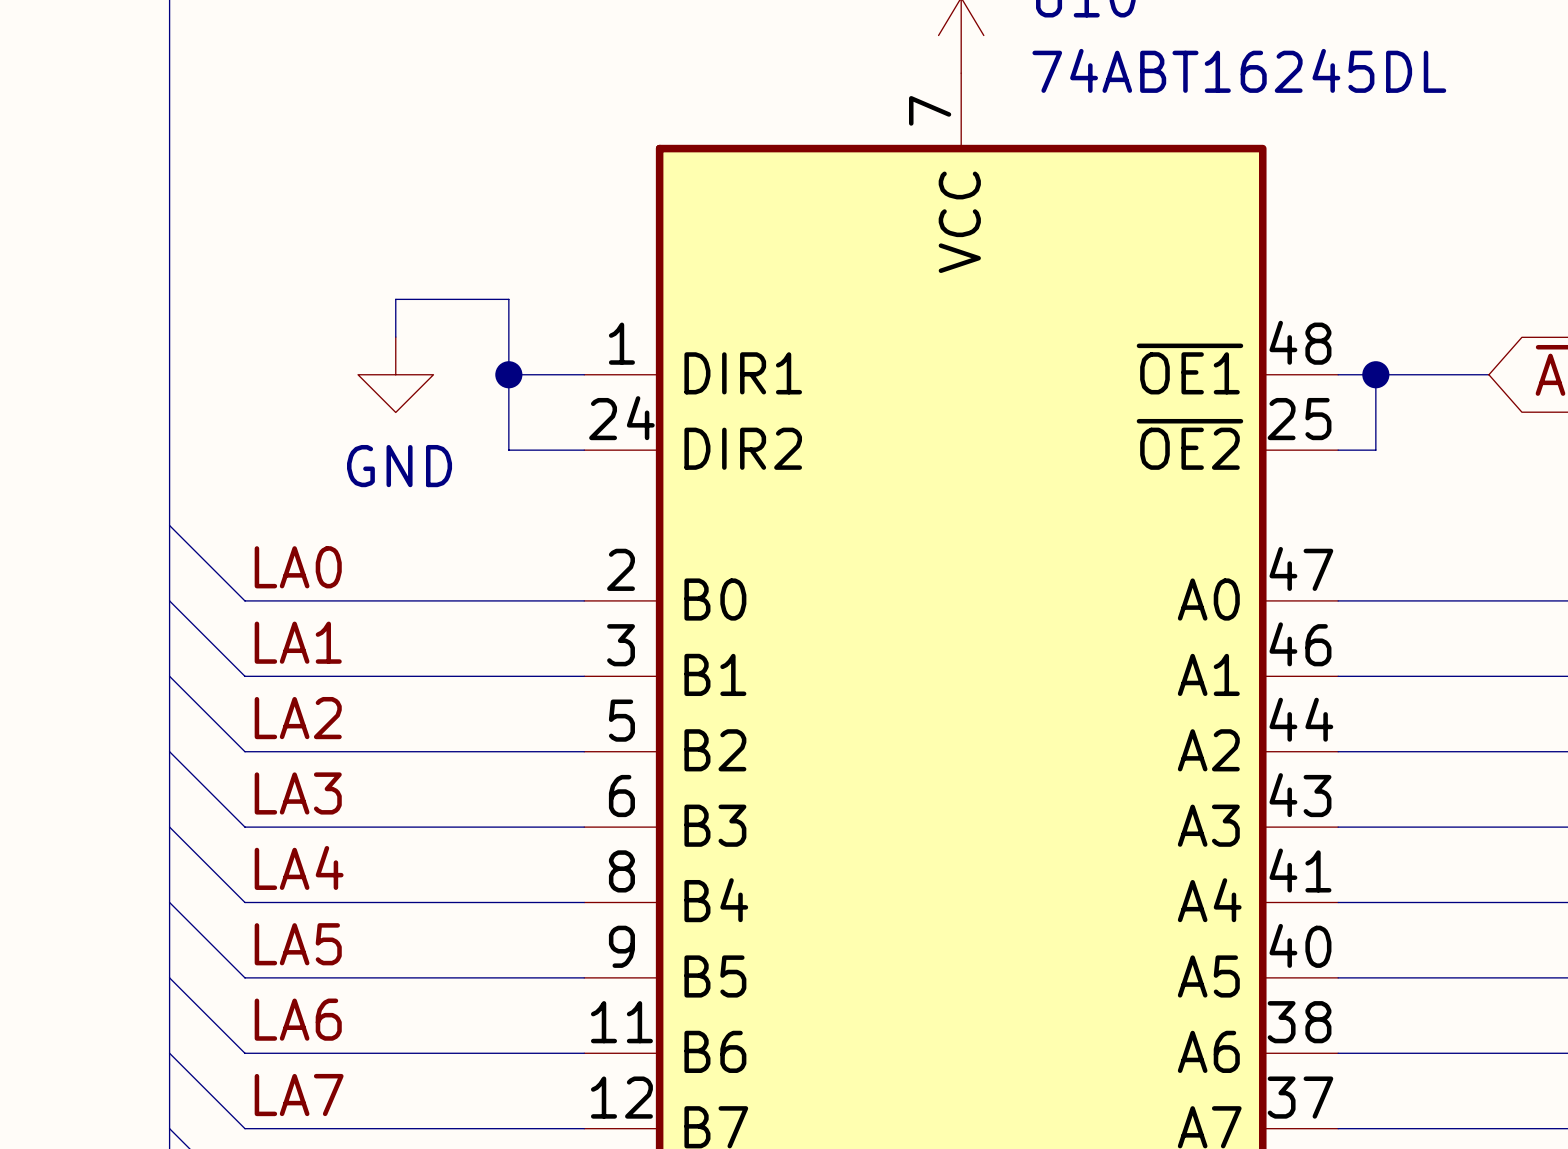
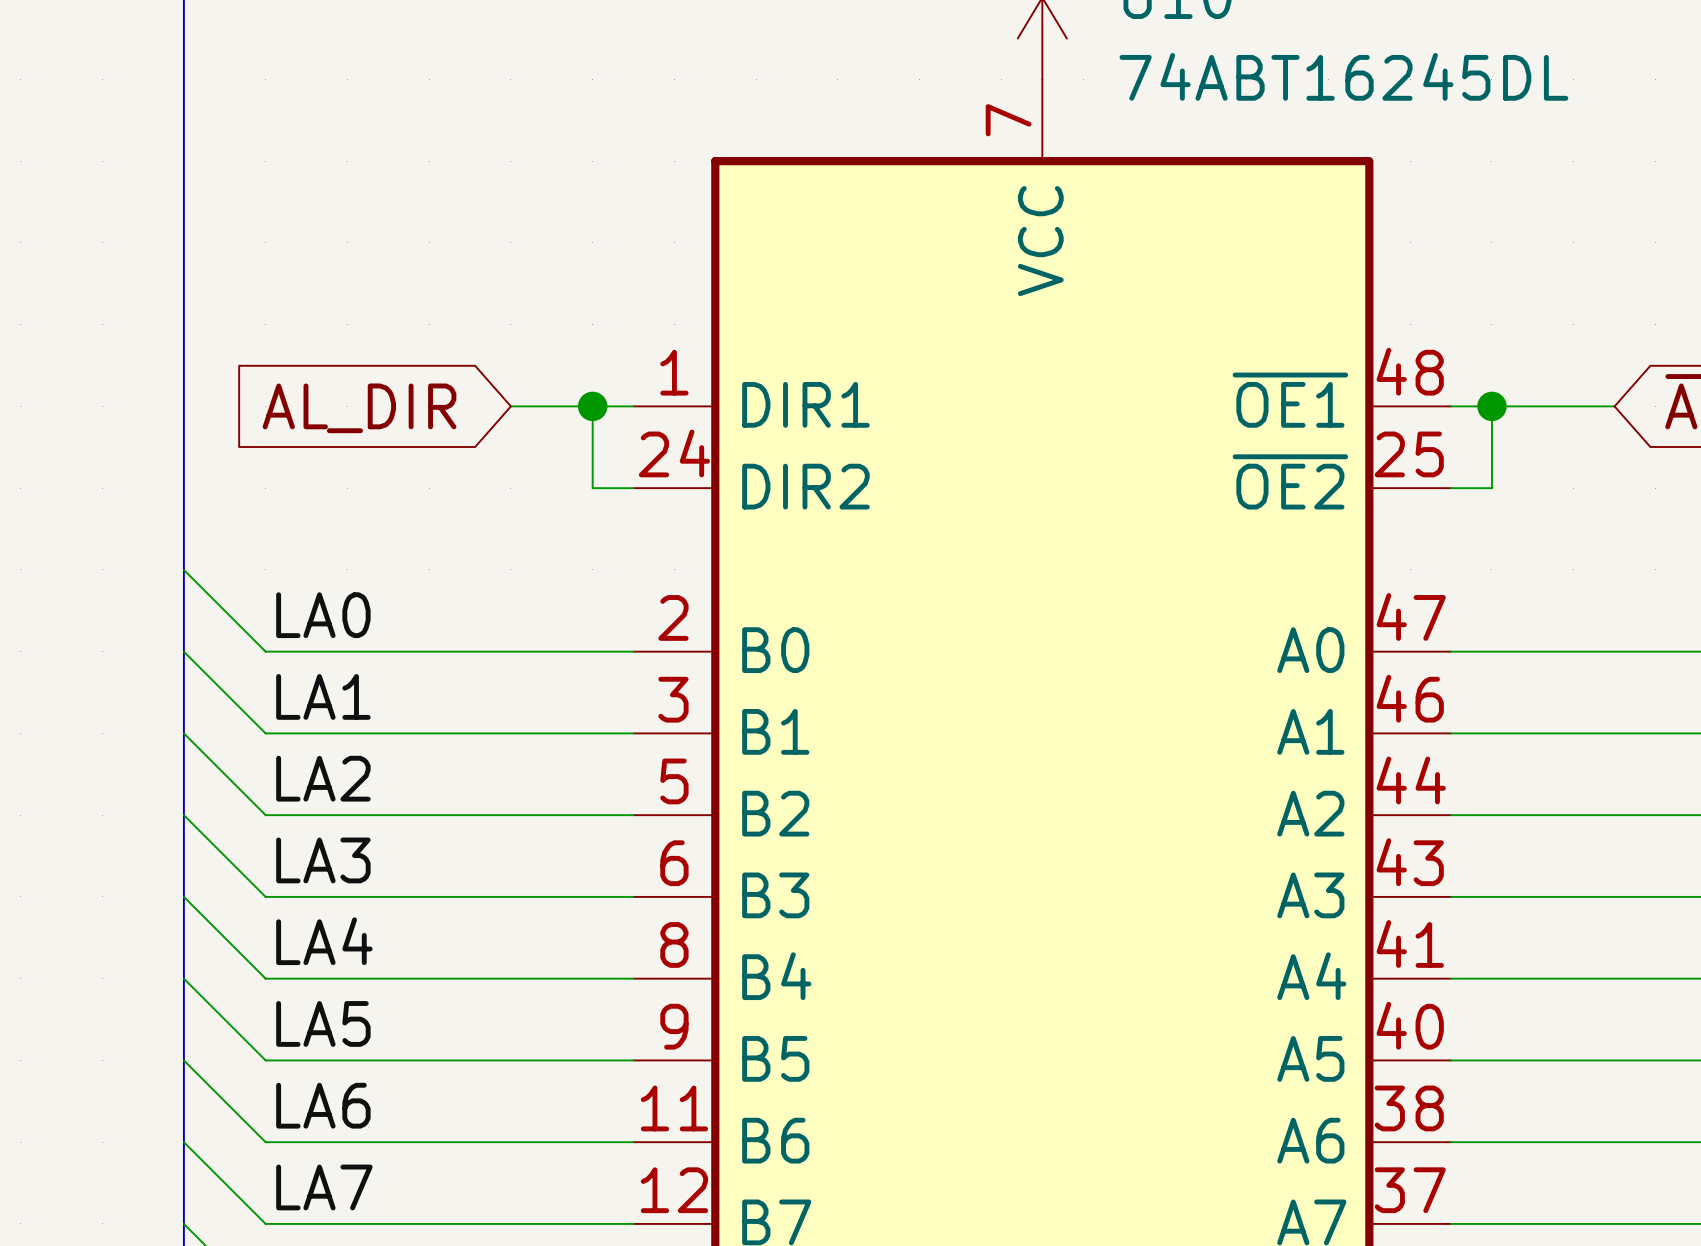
wire: (395, 337) (395, 299) (508, 299) (508, 450) (546, 450) -> (592, 406) (592, 488)
power symbol: GND (395, 374) -> none
wire: none -> (510, 406) (551, 406)
junction position: (508, 374) -> (592, 406)
global label: none -> AL_DIR (359, 408)

